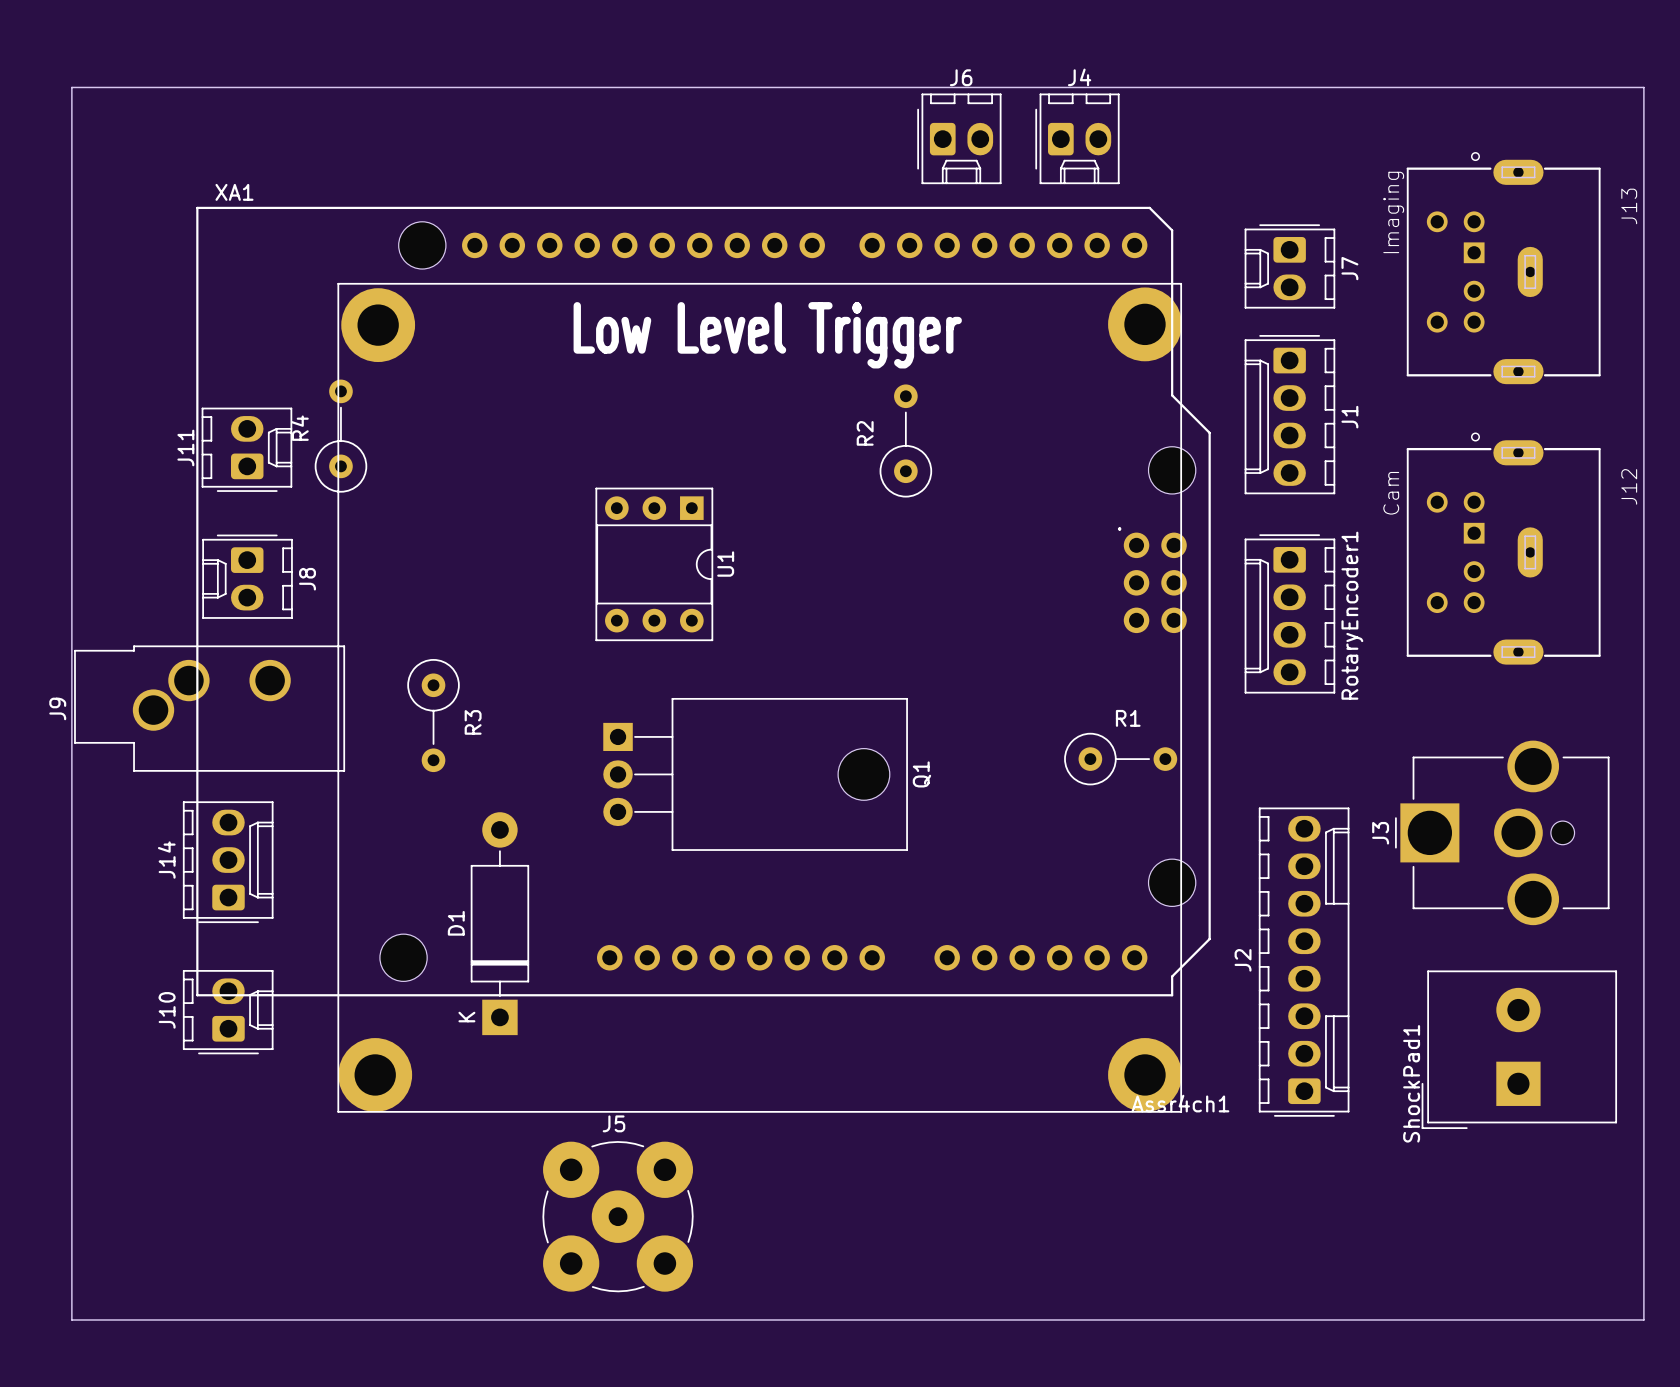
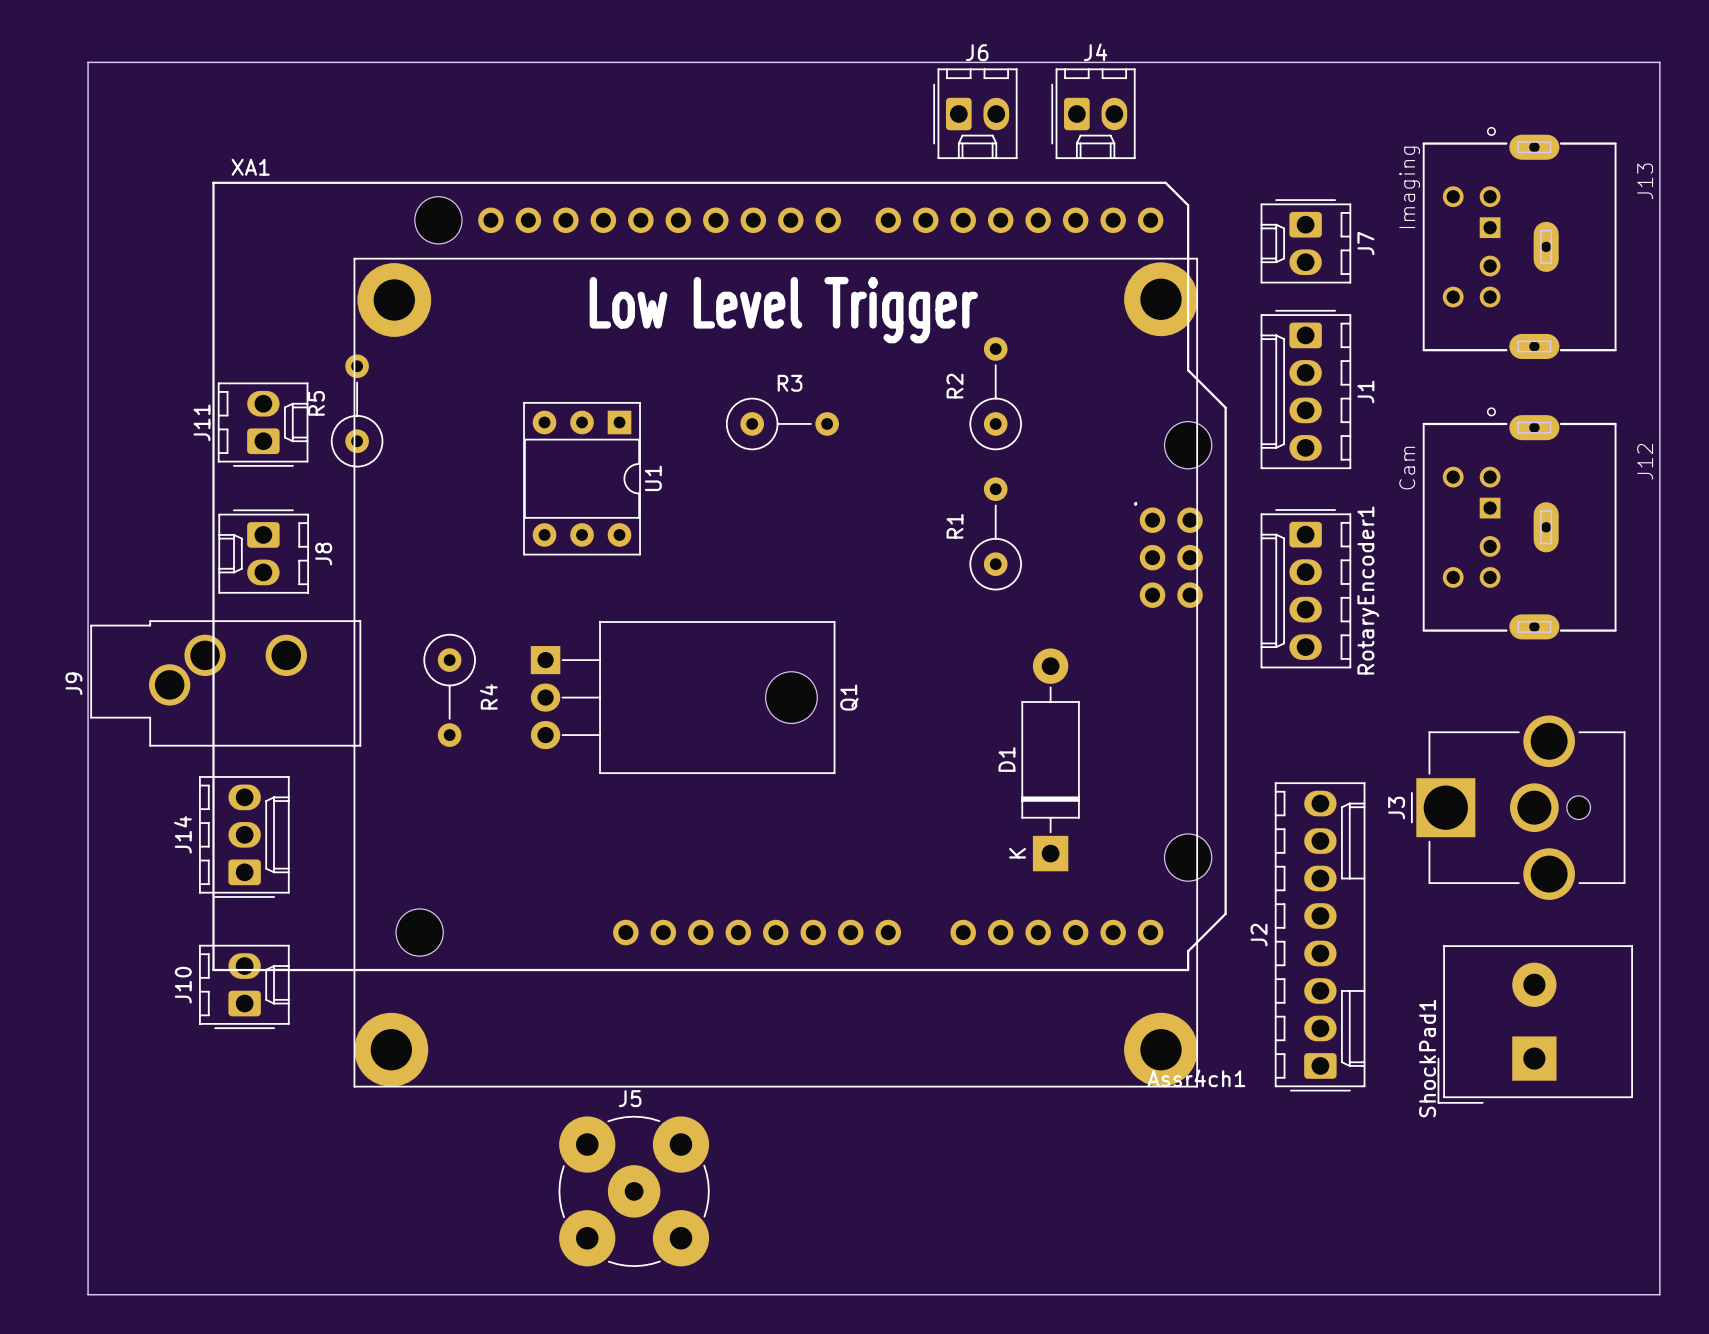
R4 name: R4 (299, 428) -> R5 (316, 403)
R2 position: (905, 440) -> (995, 393)
R3: none -> (782, 423)
U1 position: (654, 564) -> (582, 478)
R3 name: R3 (473, 722) -> R4 (488, 696)
R1 rotation: 0° (1120, 759) -> 90° counterclockwise (995, 533)
R1 position: (1120, 759) -> (995, 533)
Q1 position: (755, 774) -> (683, 697)
D1 position: (499, 923) -> (1050, 759)

